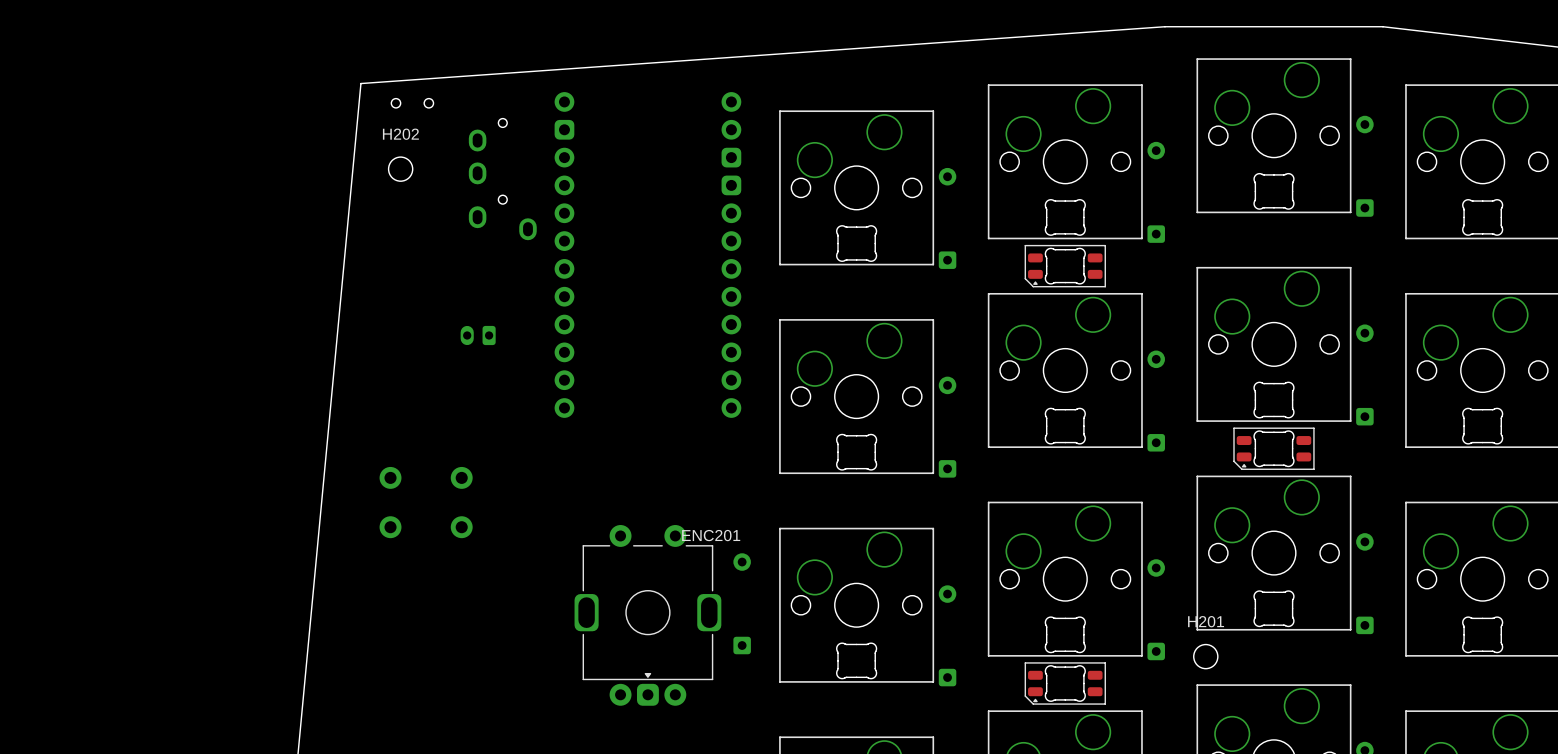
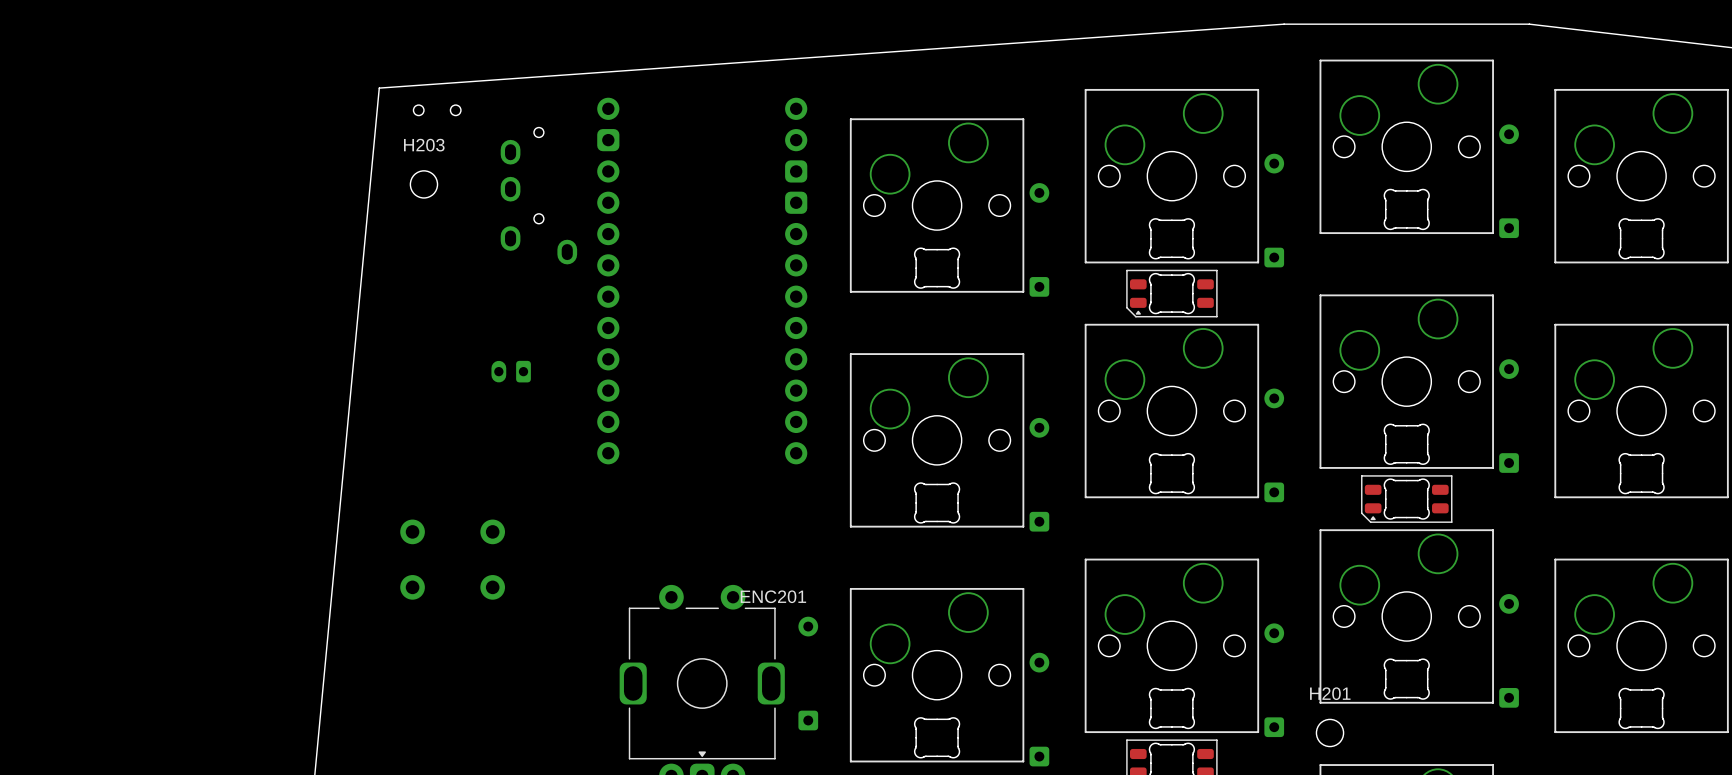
H202 name: H202 (400, 134) -> H203 (424, 145)

